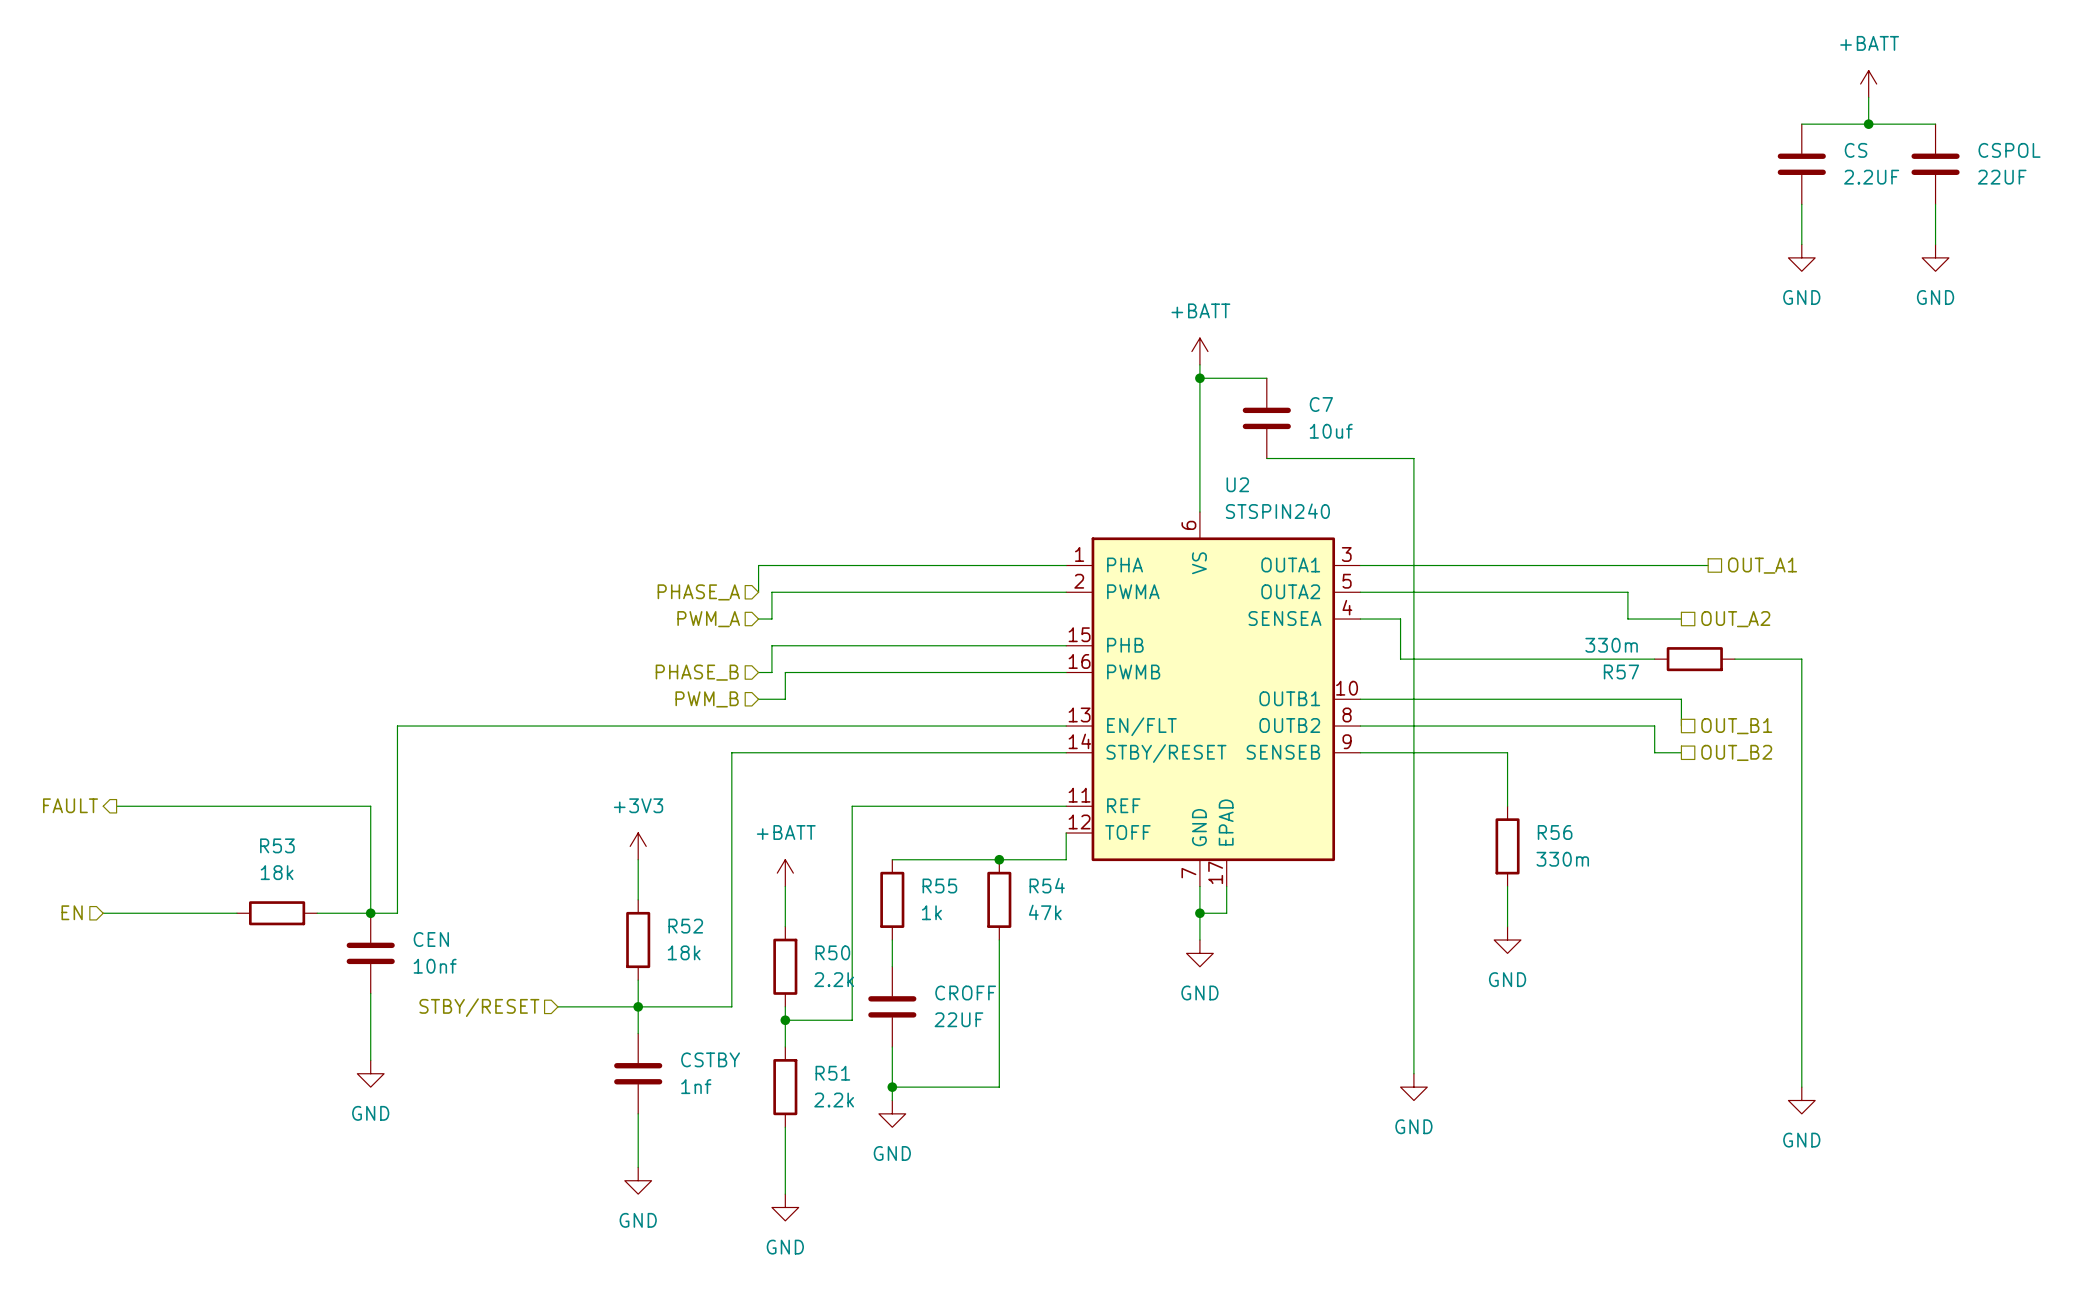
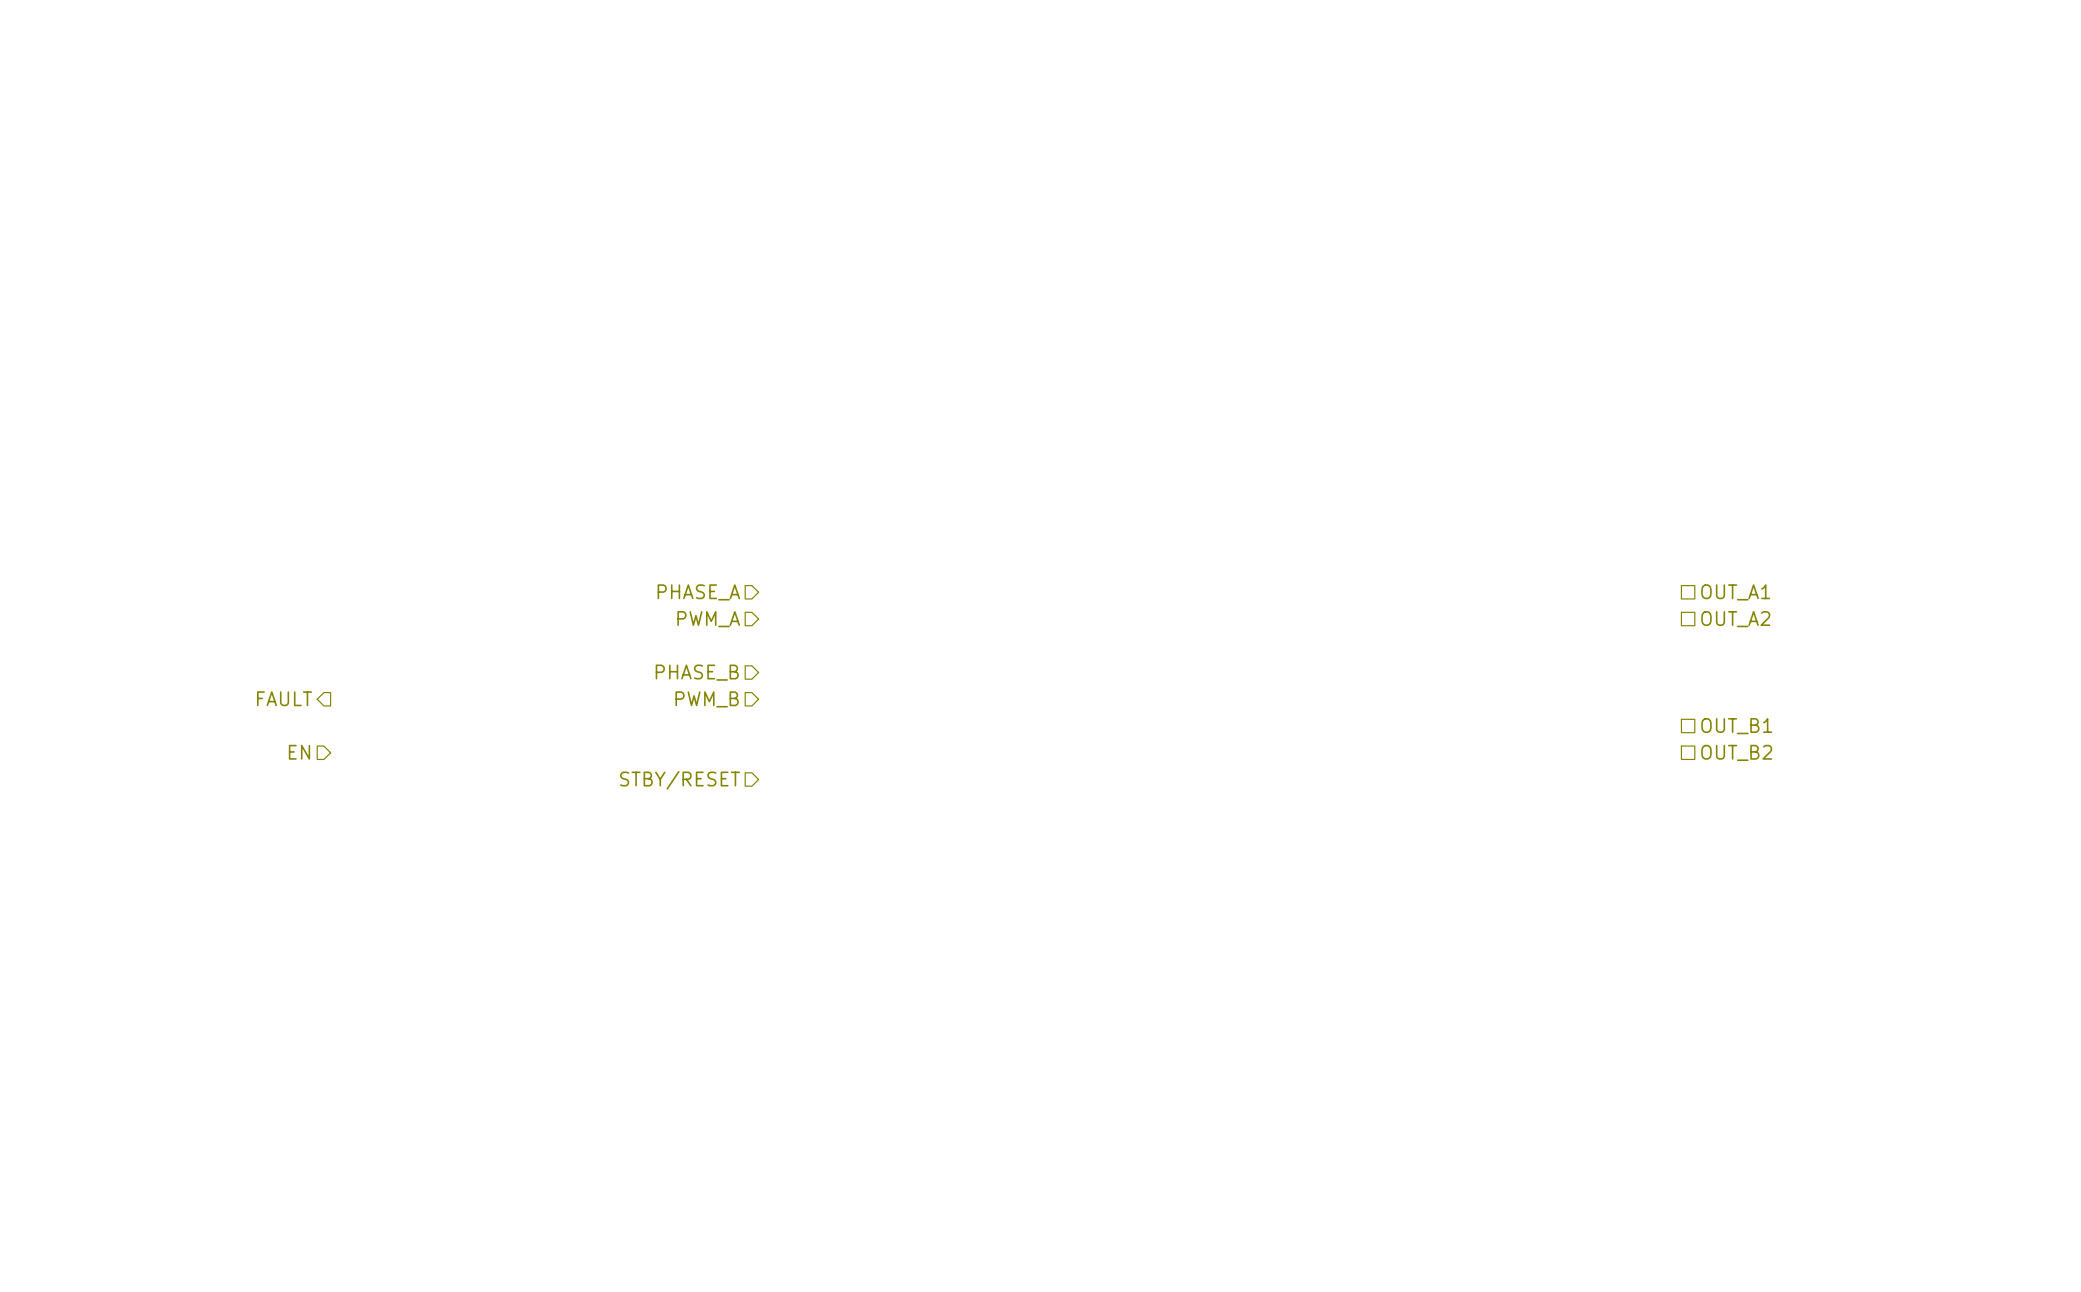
power symbol: +BATT (1868, 84) -> none
wire: (1868, 97) (1868, 124) -> none
wire: (1801, 124) (1935, 124) -> none
junction: (1868, 124) -> none
CS: 2.2UF (1801, 164) -> none
CSPOL: 22UF (1935, 164) -> none
wire: (1801, 204) (1801, 244) -> none
wire: (1935, 204) (1935, 244) -> none
power symbol: GND (1801, 257) -> none
power symbol: GND (1935, 257) -> none
power symbol: +BATT (1199, 351) -> none
wire: (1199, 364) (1199, 512) -> none
wire: (1199, 378) (1266, 378) -> none
junction: (1199, 378) -> none
C7: 10uf (1266, 418) -> none
wire: (1266, 458) (1413, 458) (1413, 1073) -> none
wire: (1066, 565) (758, 565) (758, 592) -> none
wire: (1360, 565) (1708, 565) -> none
hierarchical label position: OUT_A1 (1762, 565) -> OUT_A1 (1735, 592)
wire: (1066, 592) (771, 592) (771, 619) (758, 619) -> none
wire: (1360, 592) (1627, 592) (1627, 619) (1681, 619) -> none
wire: (1360, 619) (1400, 619) (1400, 659) (1654, 659) -> none
wire: (1066, 645) (771, 645) (771, 672) (758, 672) -> none
R57: 330m (1694, 659) -> none
wire: (1734, 659) (1801, 659) (1801, 1087) -> none
wire: (1066, 672) (785, 672) (785, 699) (758, 699) -> none
U2: STSPIN240 (1213, 699) -> none
wire: (1360, 699) (1681, 699) (1681, 726) -> none
wire: (1066, 726) (397, 726) (397, 913) (317, 913) -> none
wire: (1360, 726) (1654, 726) (1654, 752) (1681, 752) -> none
hierarchical label: none -> EN (299, 752)
wire: (1066, 752) (731, 752) (731, 1006) (557, 1006) -> none
wire: (1360, 752) (1507, 752) (1507, 806) -> none
hierarchical label: none -> STBY/RESET (680, 780)
hierarchical label position: FAULT (70, 805) -> FAULT (284, 698)
wire: (116, 806) (370, 806) (370, 913) -> none
wire: (1066, 806) (852, 806) (852, 1020) (785, 1020) -> none
wire: (1066, 833) (1066, 859) (892, 859) -> none
power symbol: +3V3 (638, 846) -> none
R56: 330m (1507, 846) -> none
wire: (638, 859) (638, 899) -> none
junction: (999, 859) -> none
power symbol: +BATT (785, 873) -> none
wire: (785, 886) (785, 926) -> none
wire: (1199, 886) (1199, 940) -> none
wire: (1226, 886) (1226, 913) (1199, 913) -> none
wire: (1507, 886) (1507, 926) -> none
R55: 1k (892, 899) -> none
R54: 47k (999, 899) -> none
hierarchical label: EN (72, 912) -> none
wire: (103, 913) (236, 913) -> none
R53: 18k (277, 913) -> none
junction: (370, 913) -> none
junction: (1199, 913) -> none
R52: 18k (638, 940) -> none
wire: (892, 940) (892, 966) -> none
wire: (999, 940) (999, 1087) (892, 1087) -> none
power symbol: GND (1507, 940) -> none
CEN: 10nf (370, 953) -> none
power symbol: GND (1199, 953) -> none
R50: 2.2k (785, 966) -> none
wire: (638, 980) (638, 1033) -> none
wire: (370, 993) (370, 1060) -> none
junction: (638, 1006) -> none
wire: (785, 1006) (785, 1047) -> none
CROFF: 22UF (892, 1006) -> none
hierarchical label: STBY/RESET (479, 1007) -> none
junction: (785, 1020) -> none
wire: (892, 1047) (892, 1100) -> none
power symbol: GND (370, 1073) -> none
CSTBY: 1nf (638, 1073) -> none
R51: 2.2k (785, 1087) -> none
junction: (892, 1087) -> none
power symbol: GND (1413, 1087) -> none
power symbol: GND (1801, 1100) -> none
wire: (638, 1113) (638, 1167) -> none
power symbol: GND (892, 1113) -> none
wire: (785, 1127) (785, 1194) -> none
power symbol: GND (638, 1180) -> none
power symbol: GND (785, 1207) -> none

